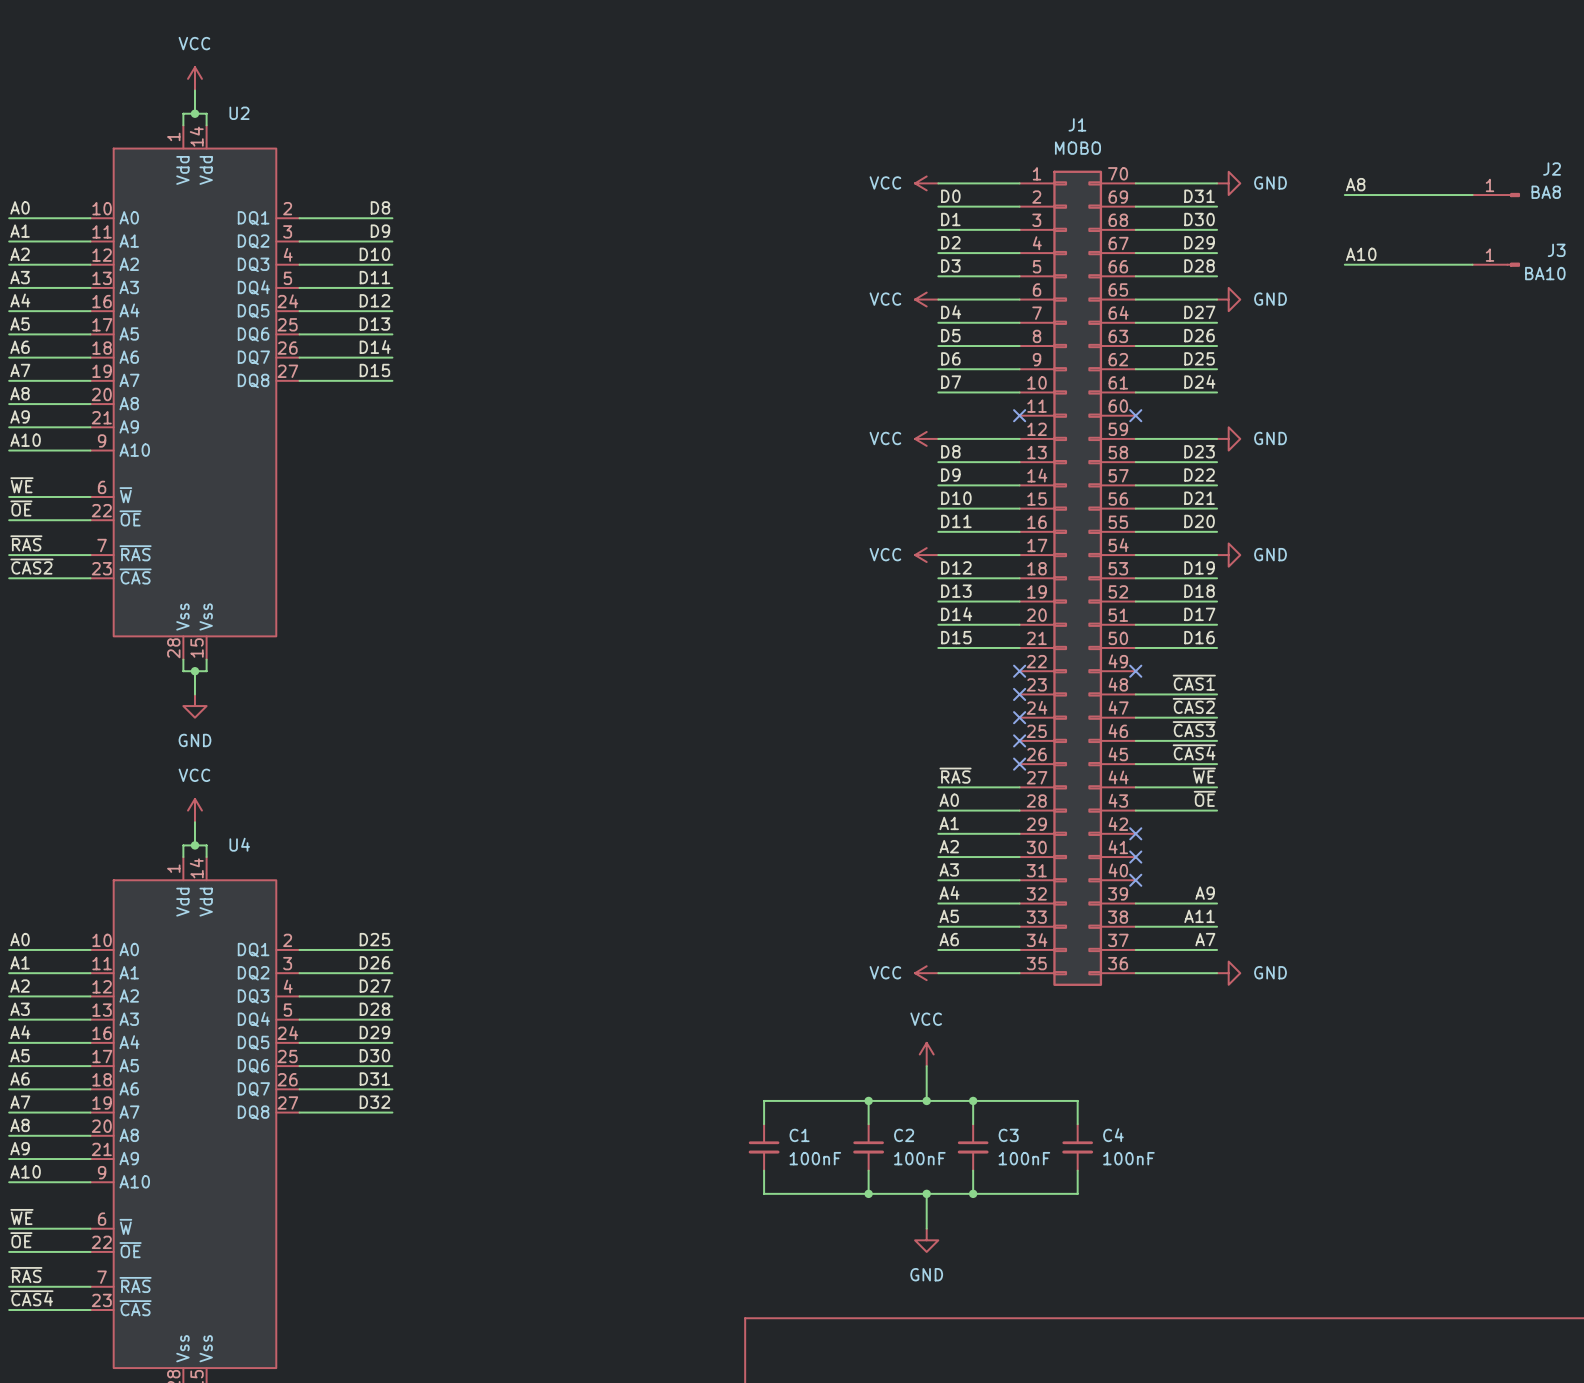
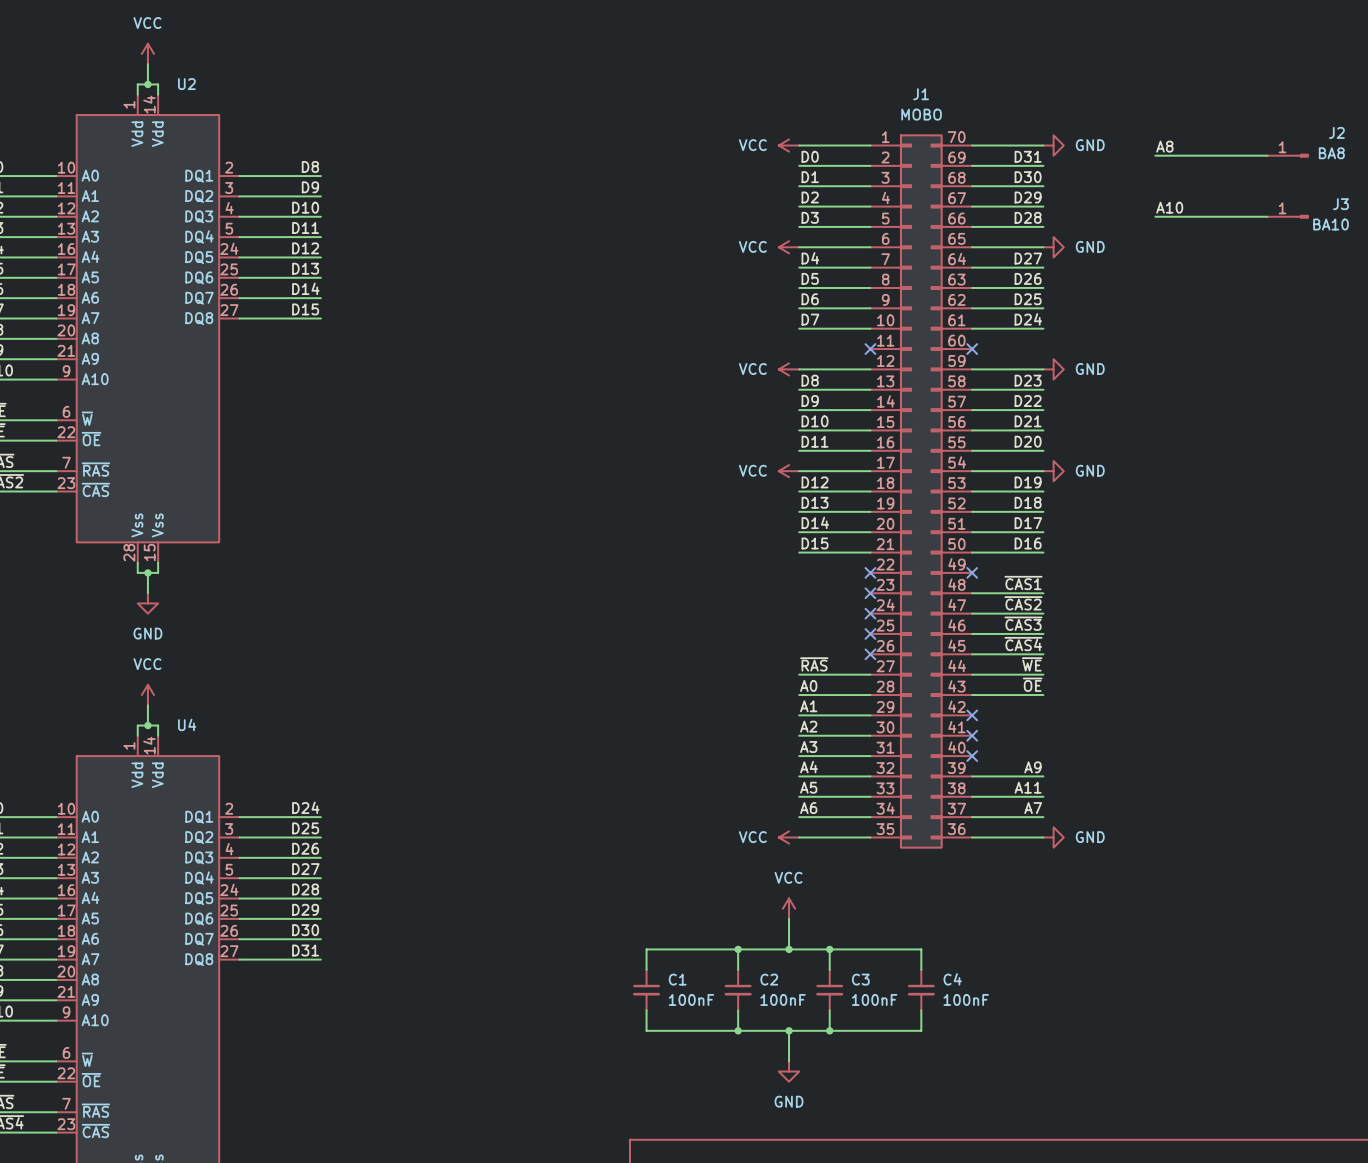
label: D25 (374, 939) -> D24 (305, 807)
label: D26 (374, 962) -> D25 (305, 828)
label: D27 (375, 986) -> D26 (305, 848)
label: D28 (374, 1009) -> D27 (305, 869)
label: D29 (374, 1032) -> D28 (305, 889)
label: D30 (374, 1055) -> D29 (305, 909)
label: D31 (374, 1078) -> D30 (305, 930)
label: D32 (374, 1102) -> D31 (305, 950)

